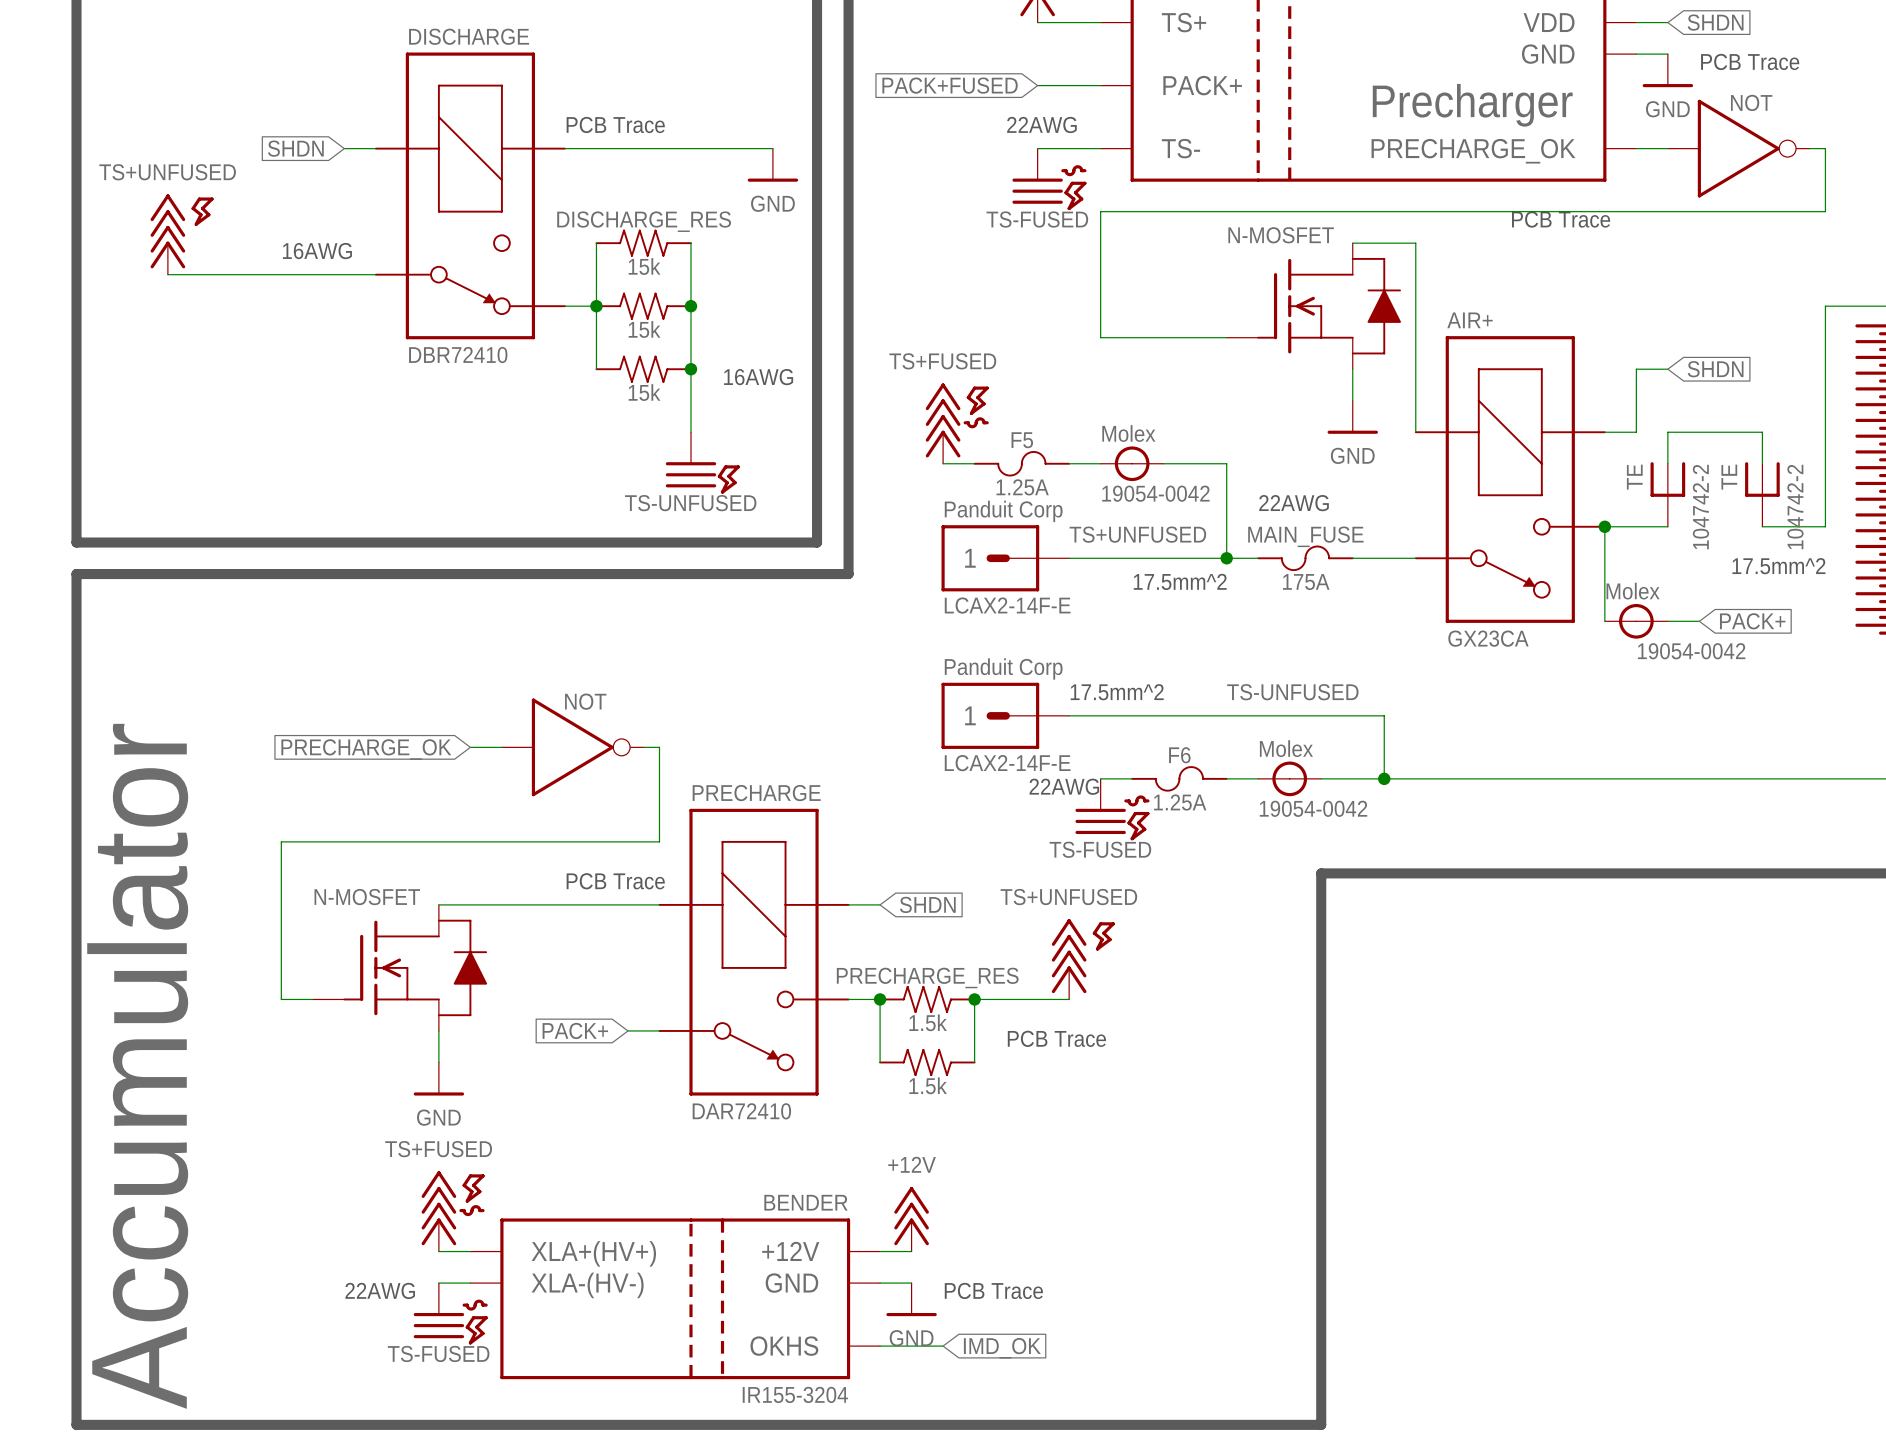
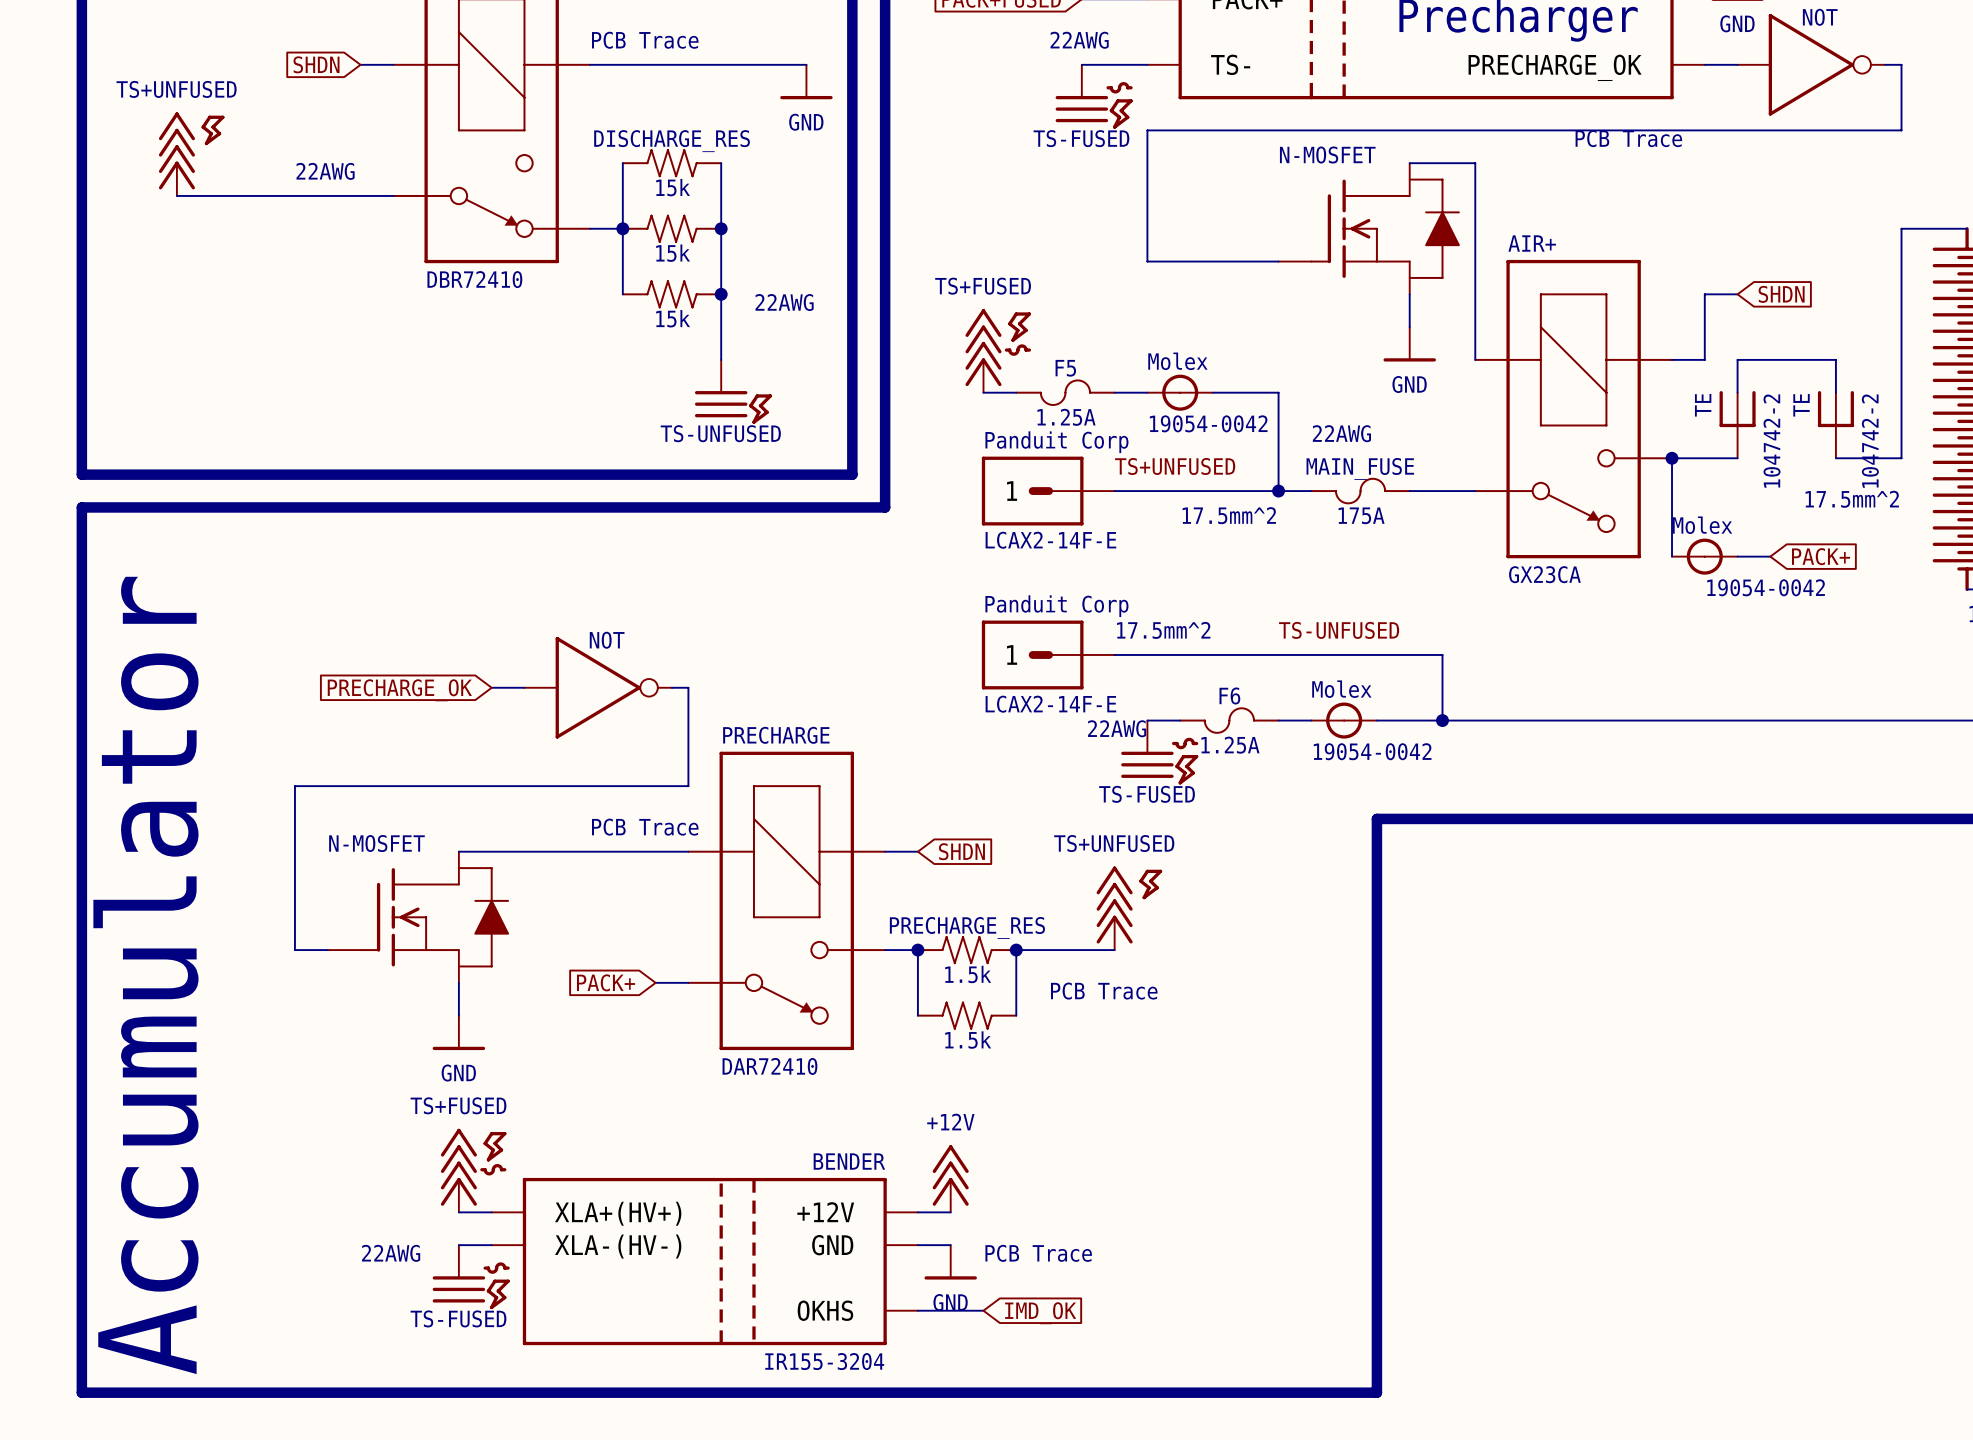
text: 16AWG (317, 251) -> 22AWG (325, 171)
text: 16AWG (758, 377) -> 22AWG (784, 302)

